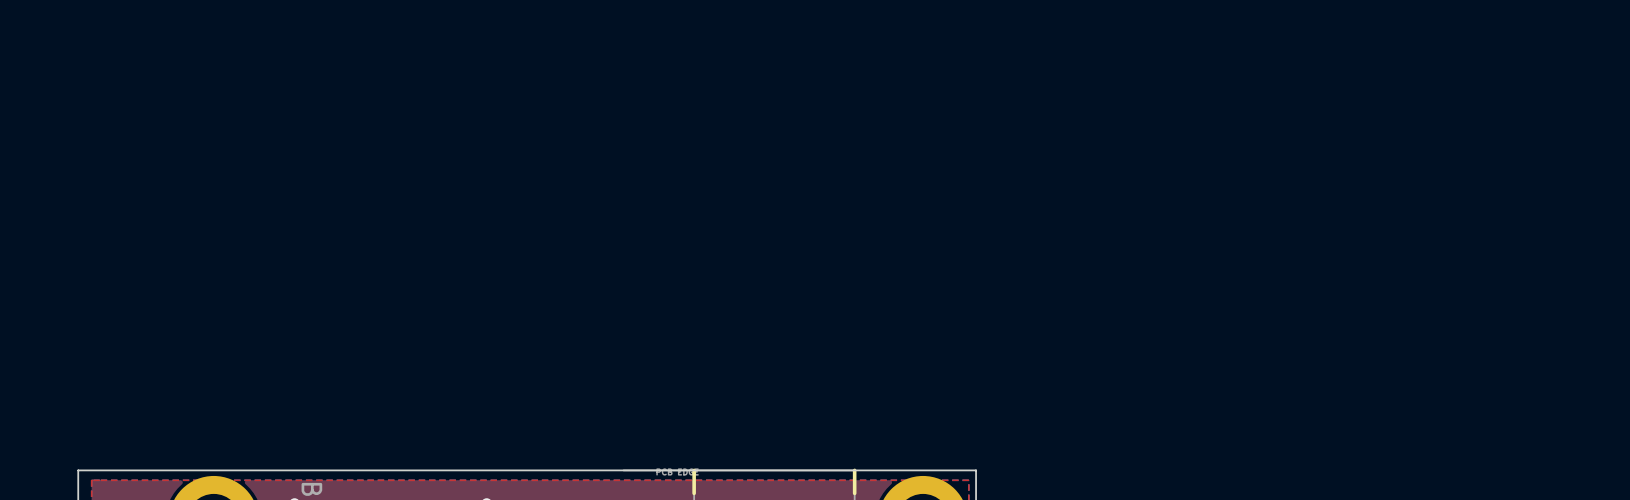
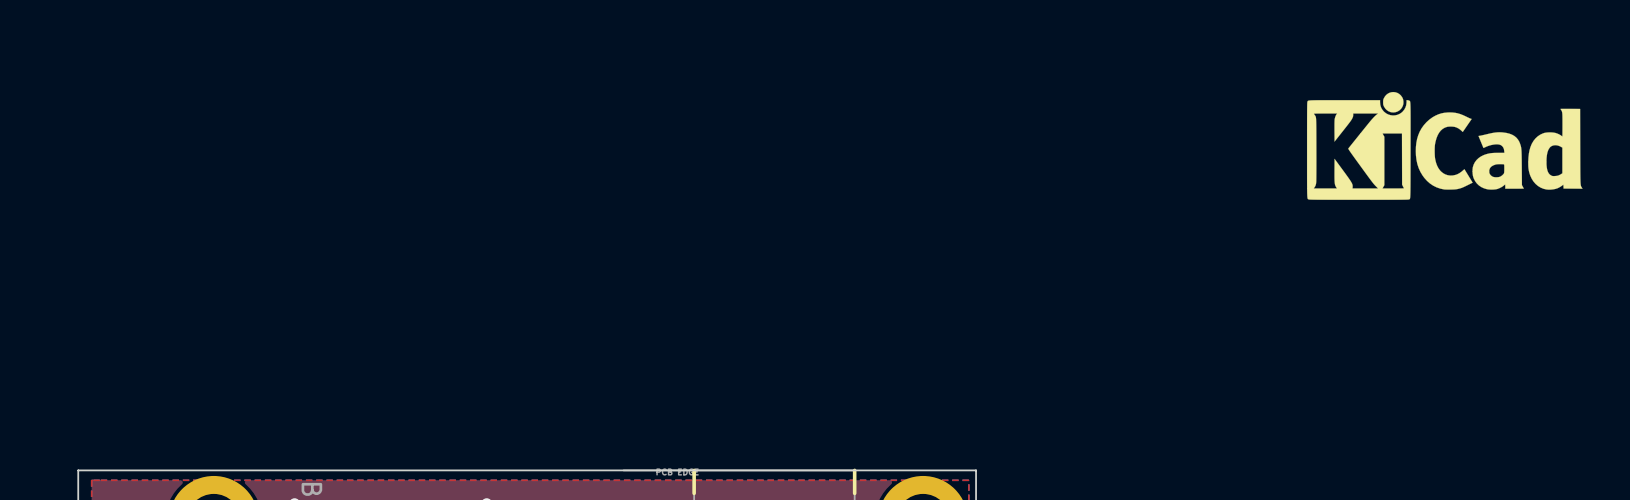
drawing: none -> [1306, 91, 1583, 200]

